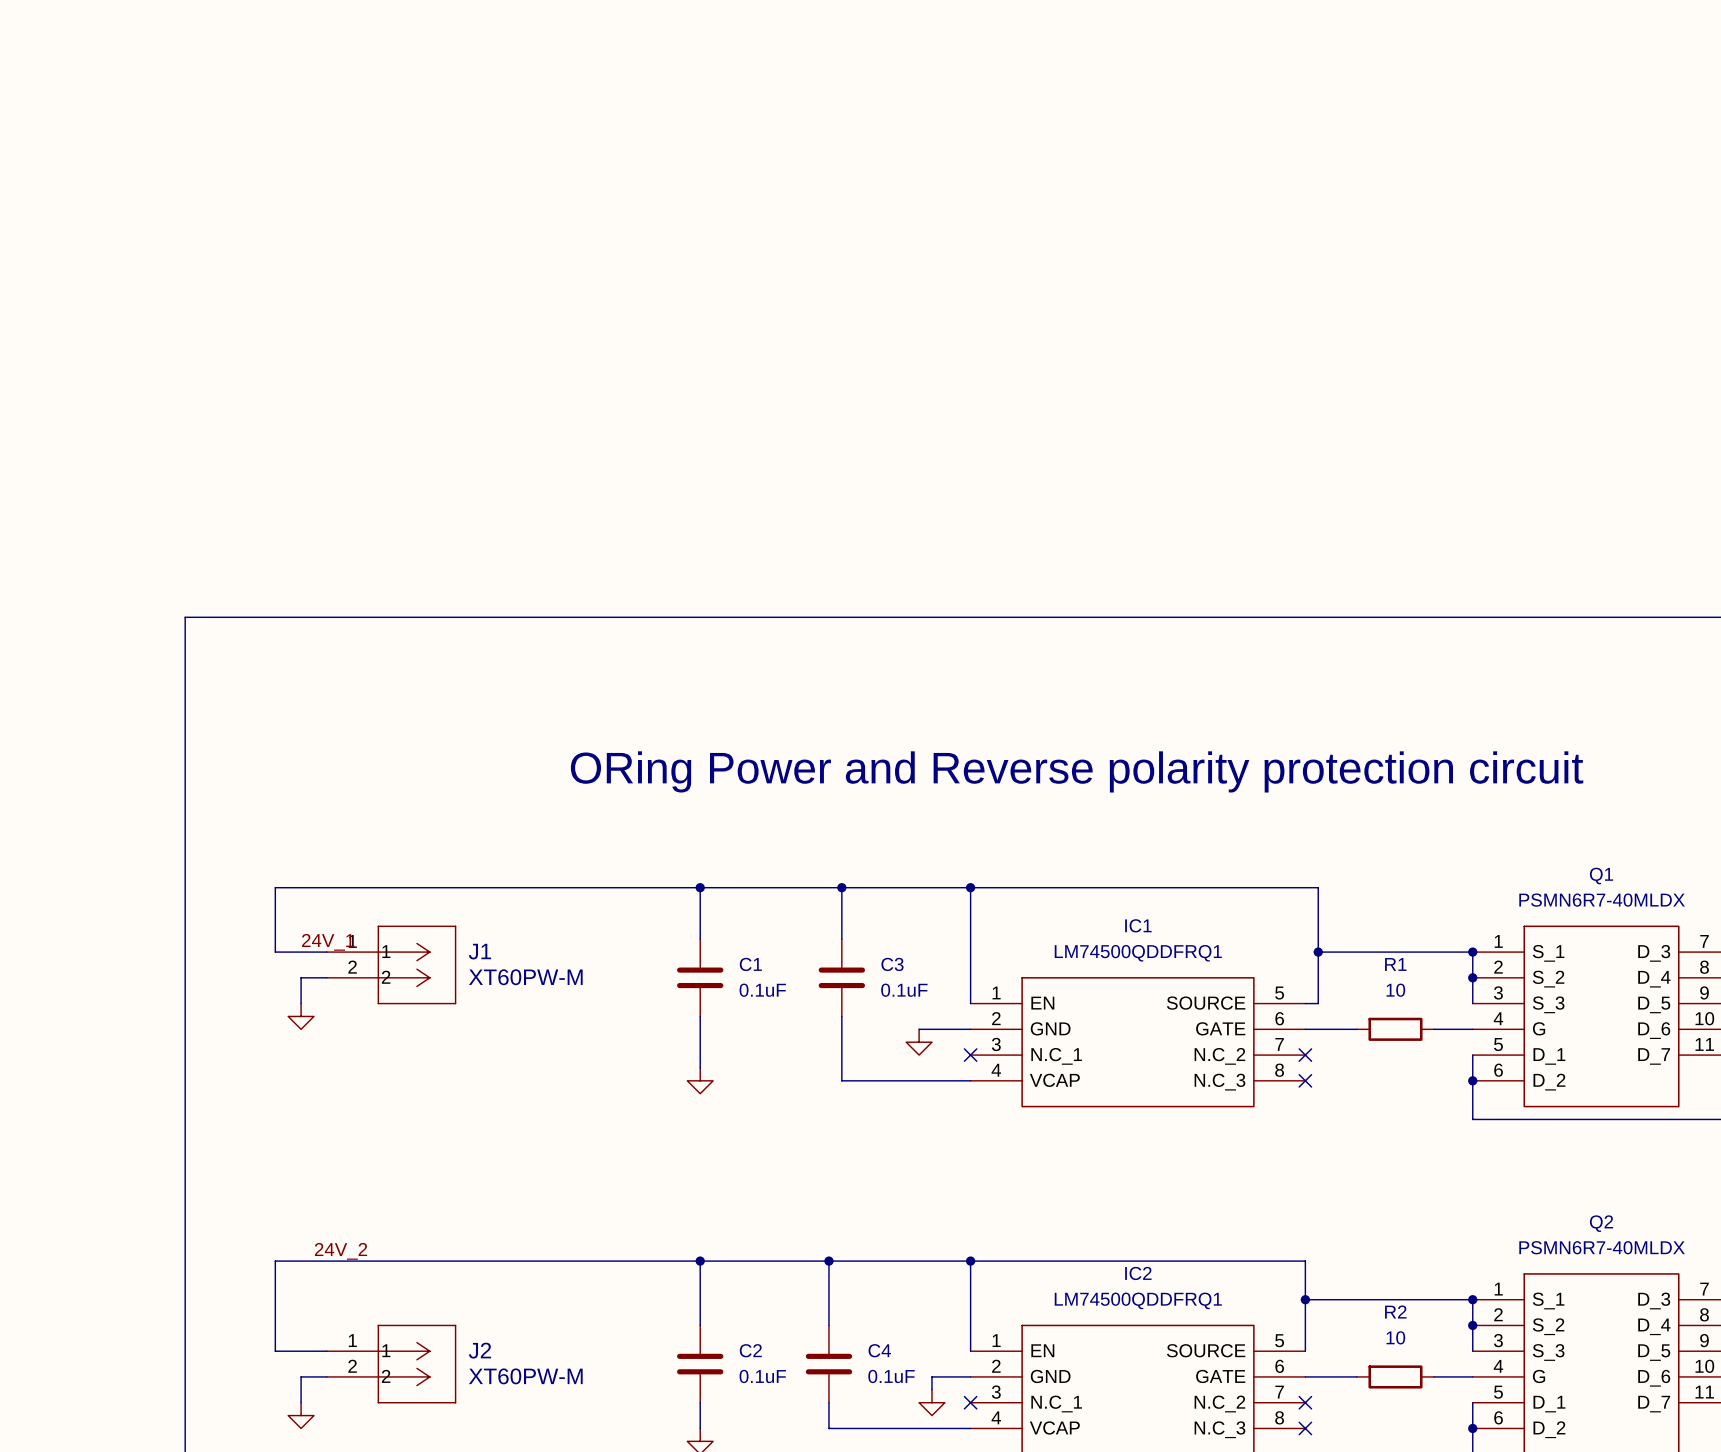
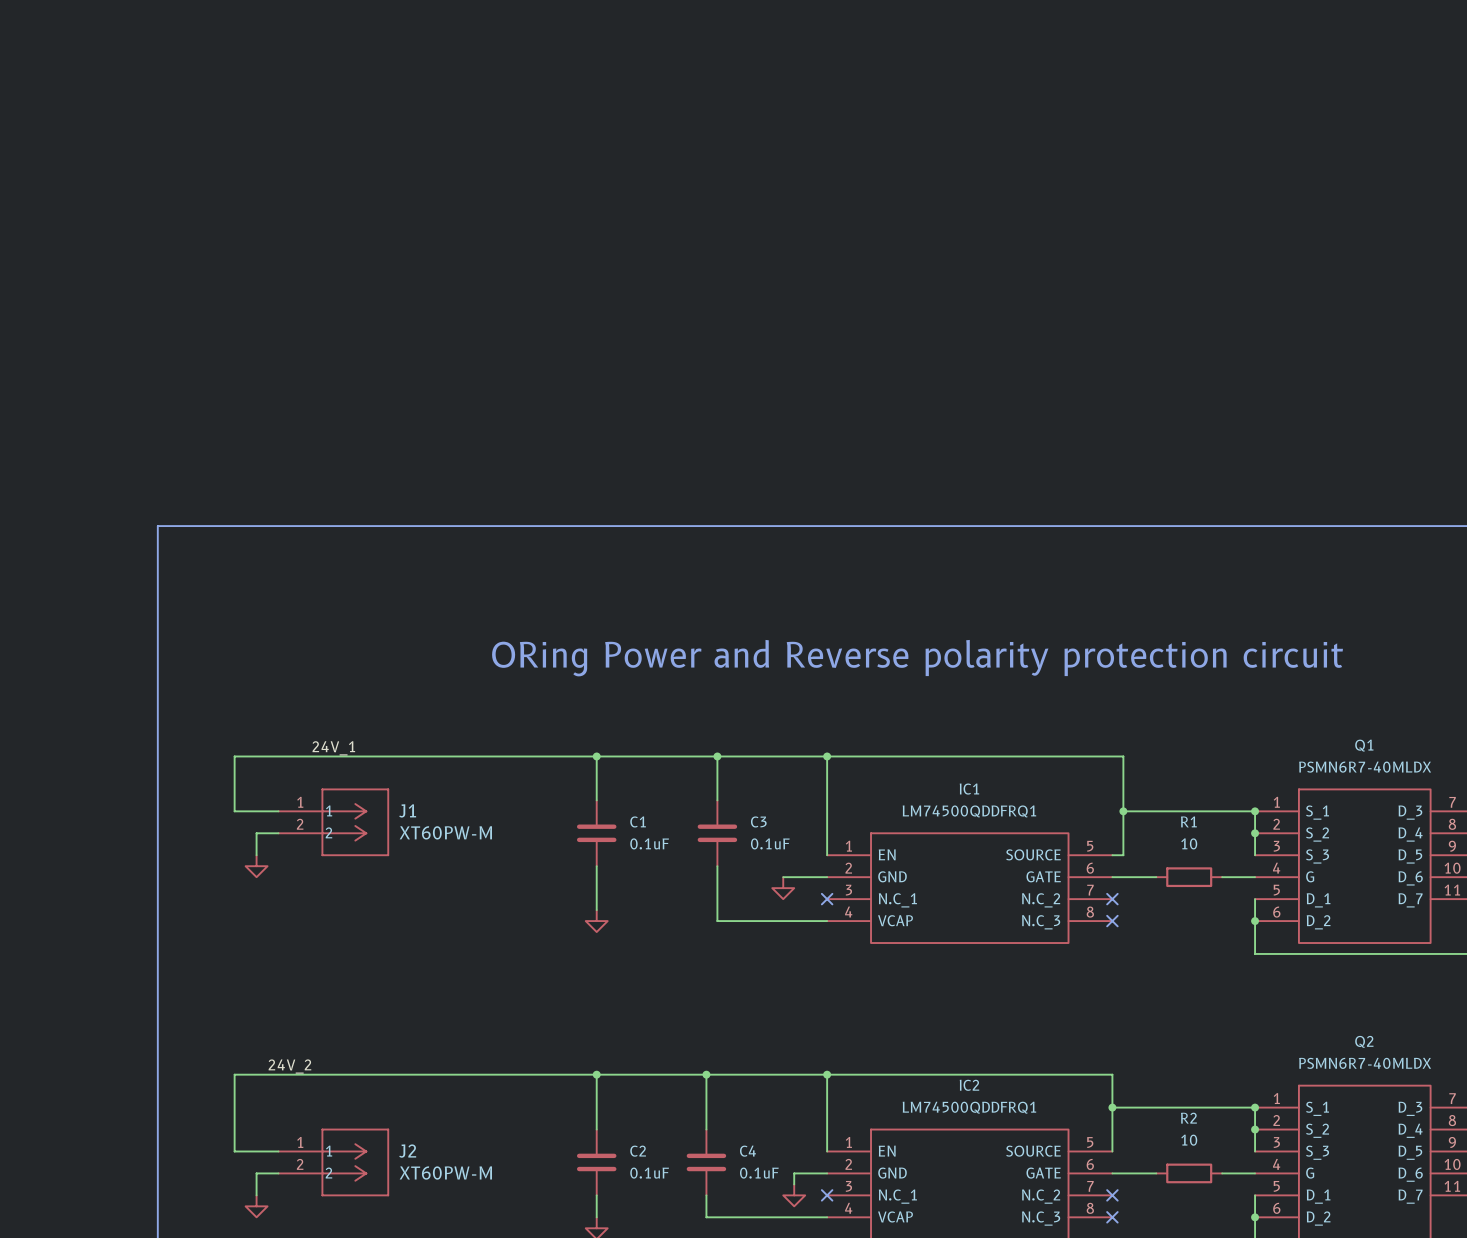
label position: 24V_1 (328, 942) -> 24V_1 (333, 748)

